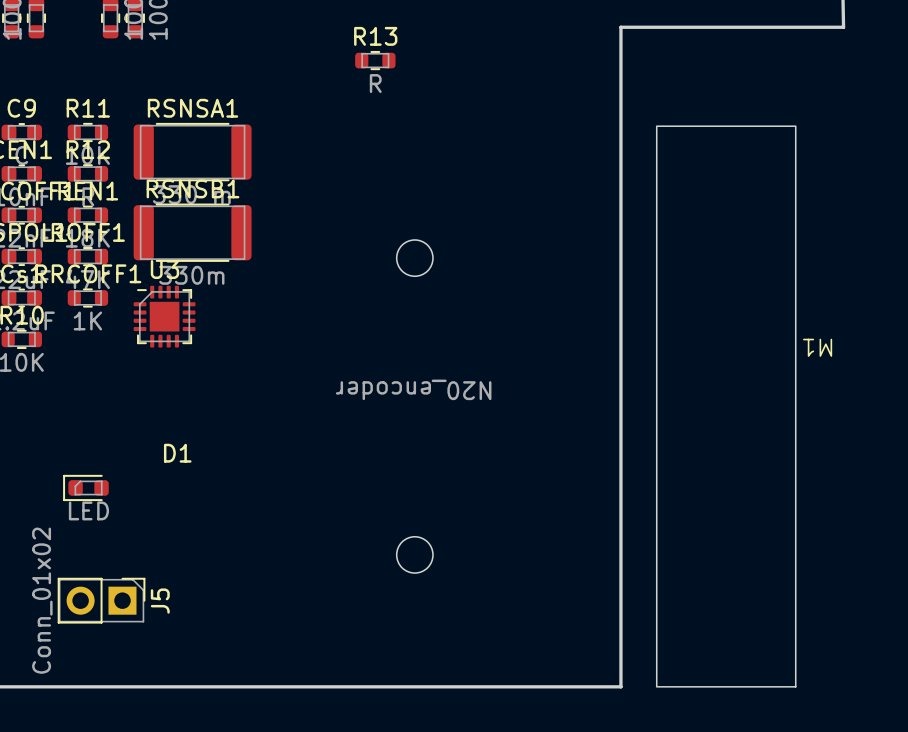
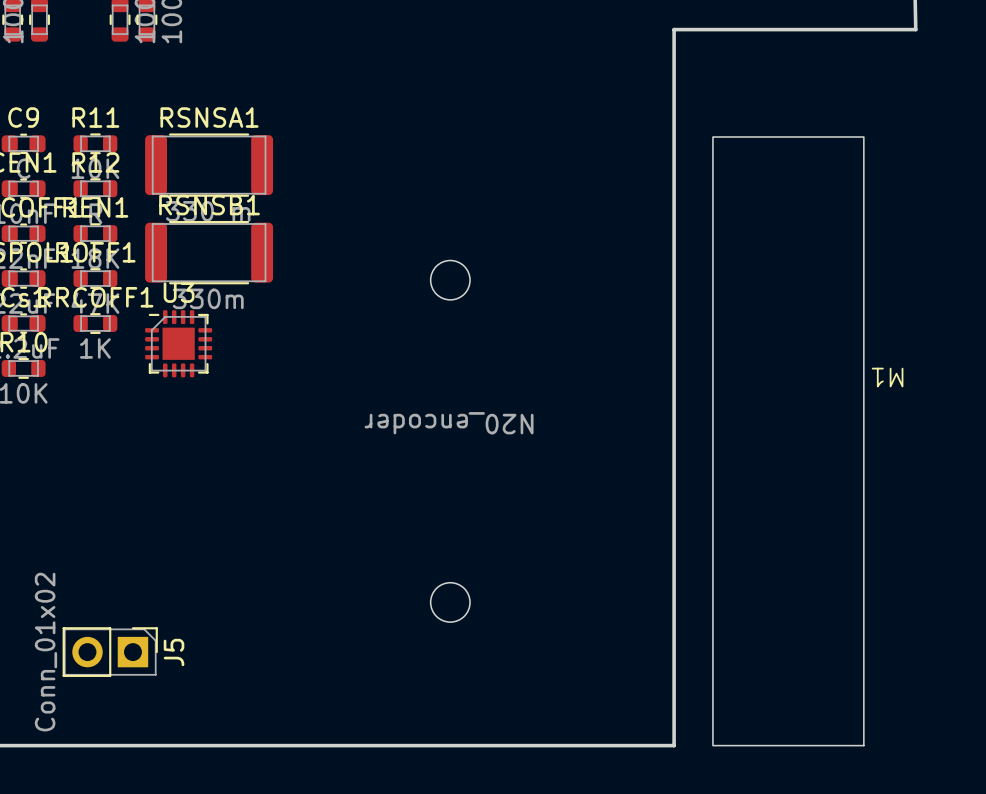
R13: R (375, 60) -> none
D1: LED (85, 487) -> none

